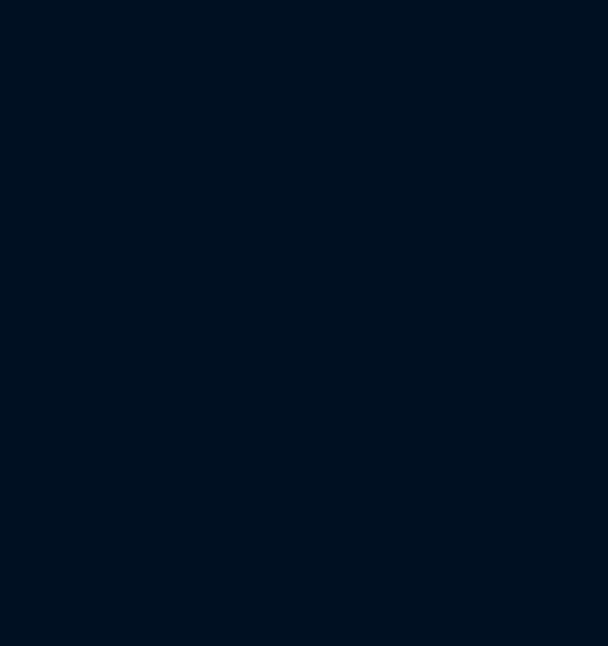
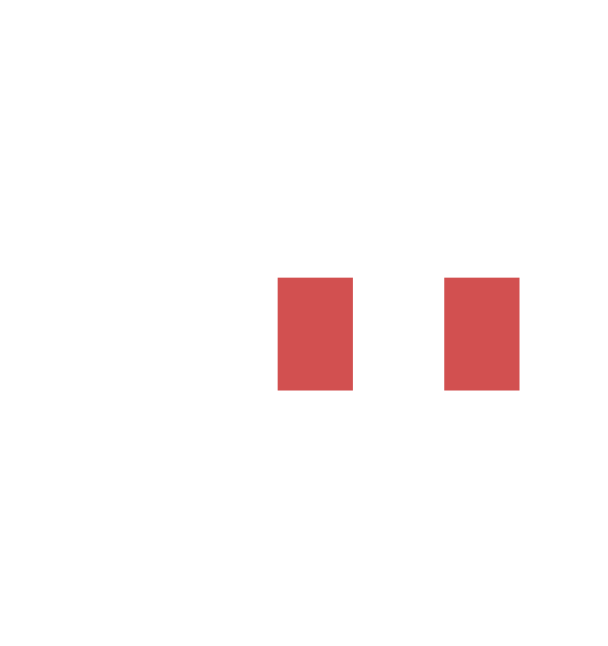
part: none -> (398, 334)

